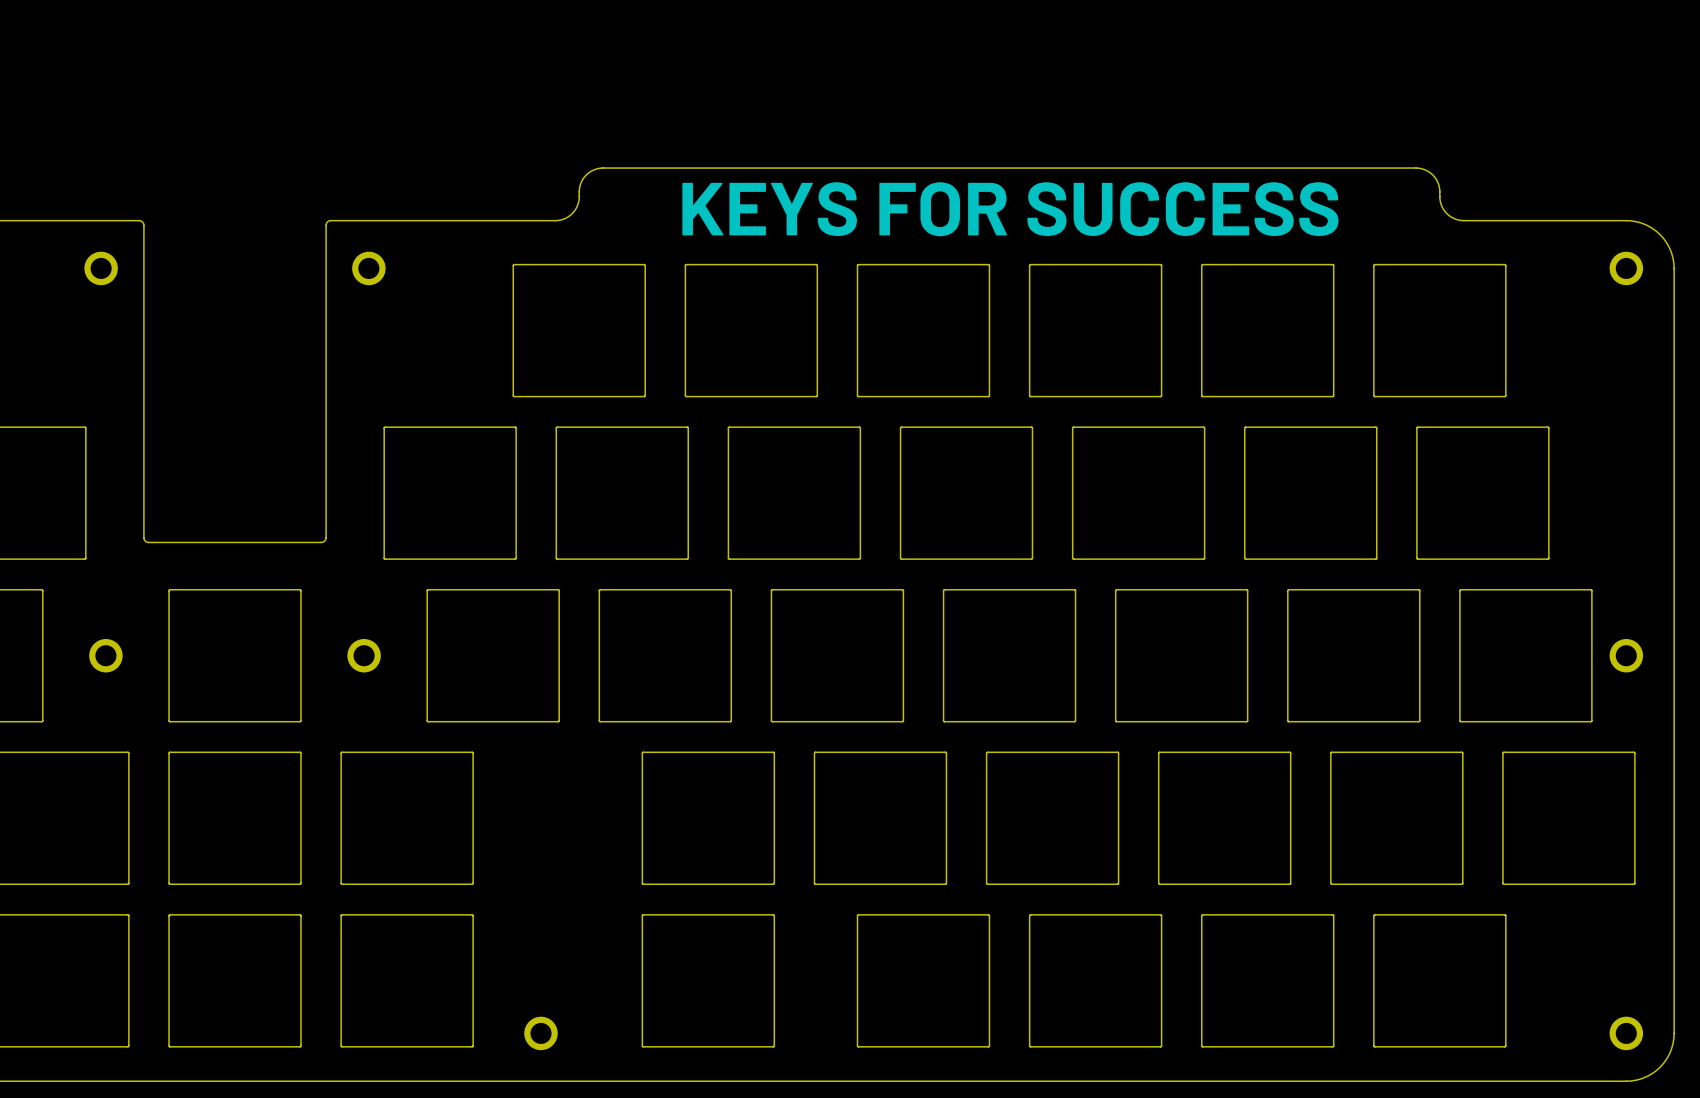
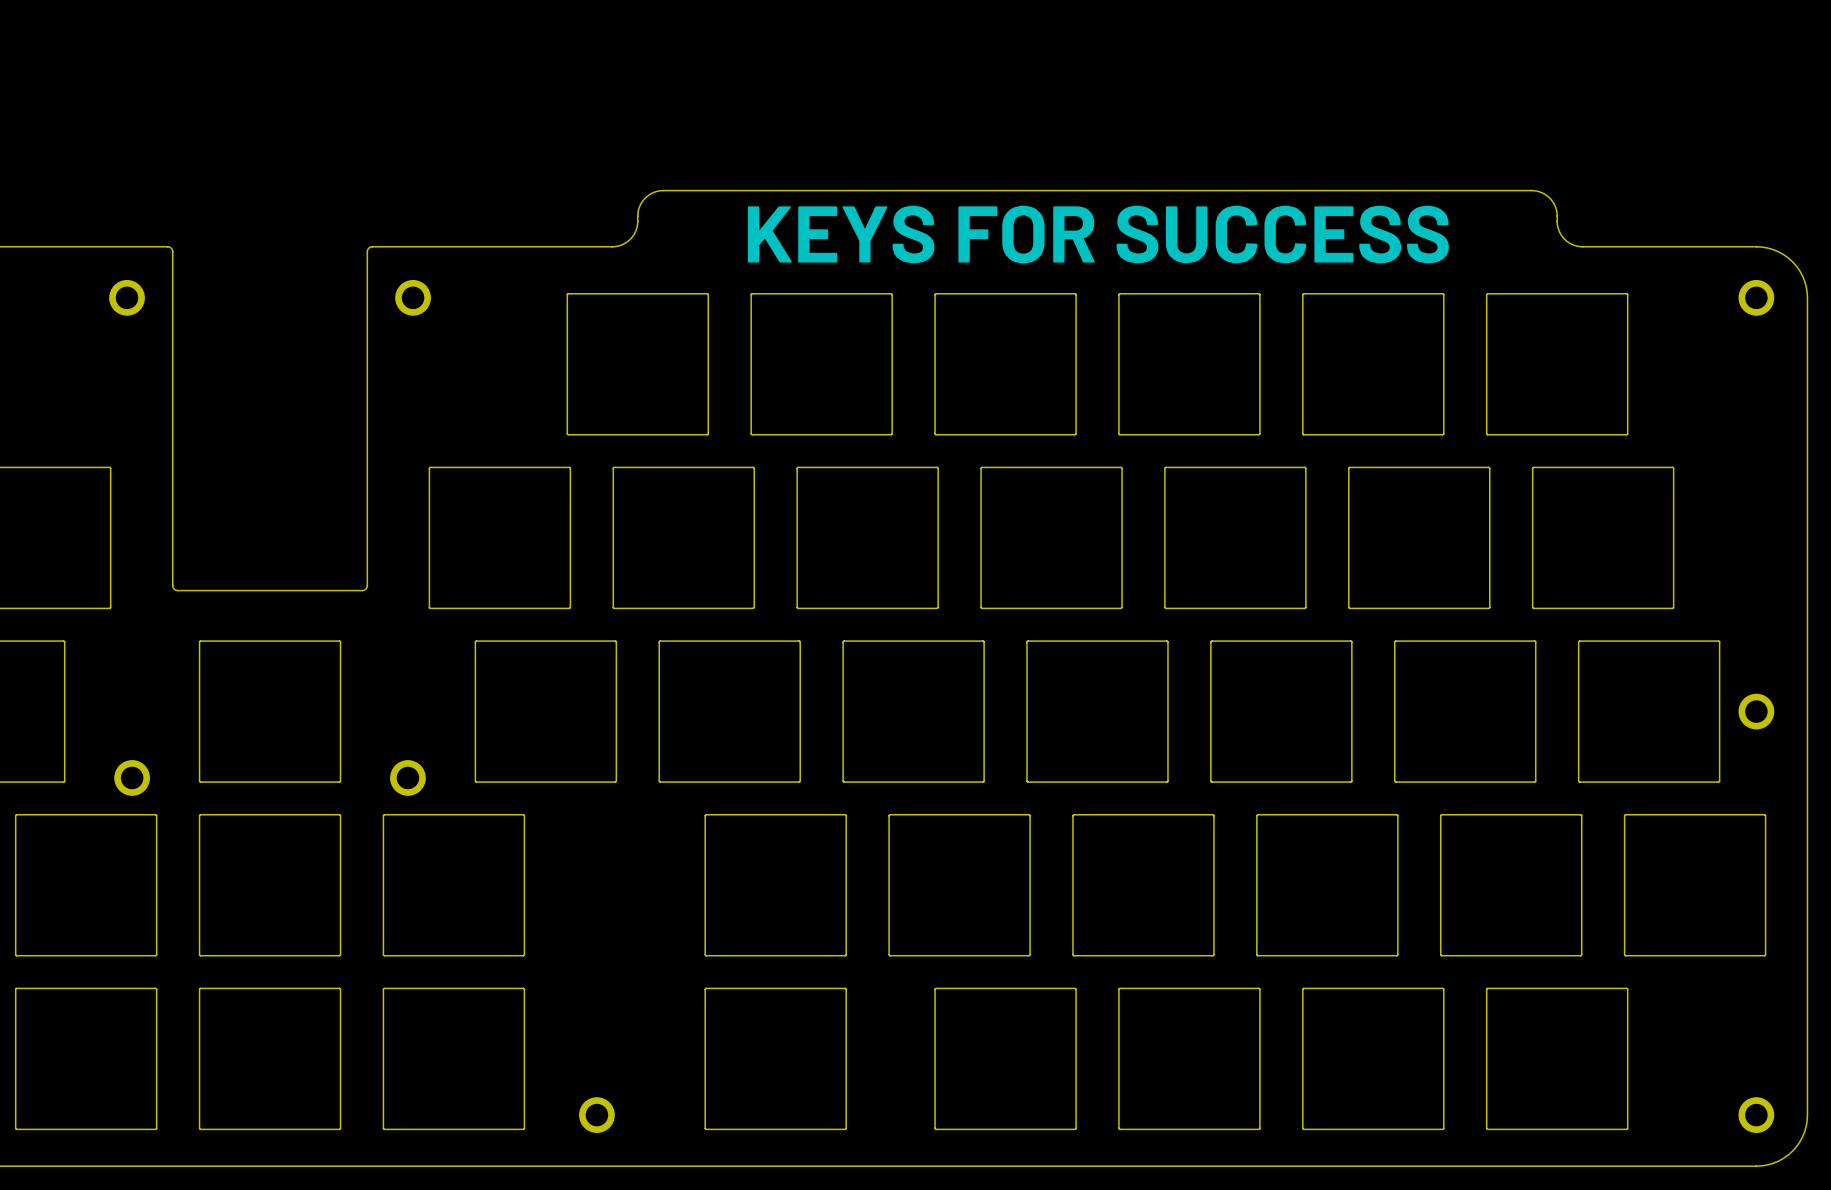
part position: (105, 655) -> (132, 777)
part position: (364, 655) -> (407, 777)

